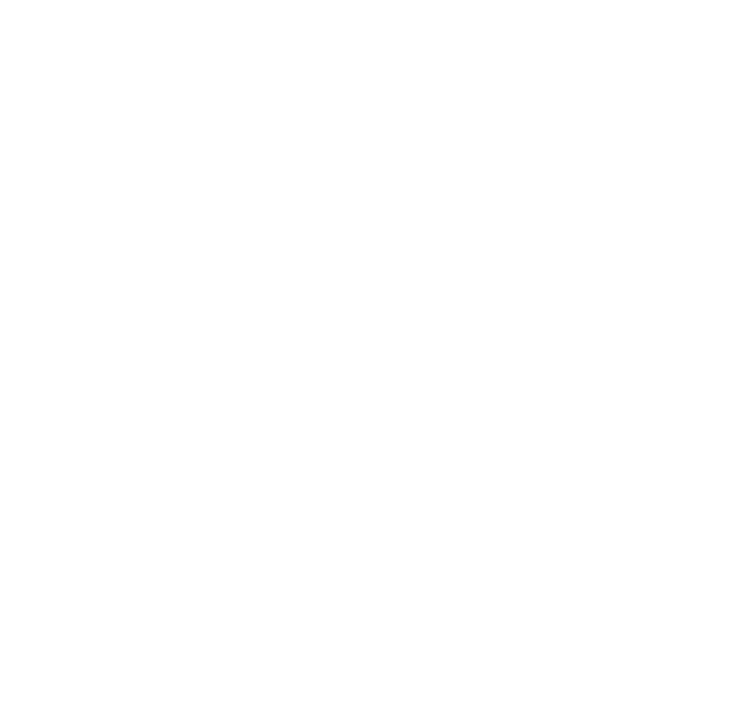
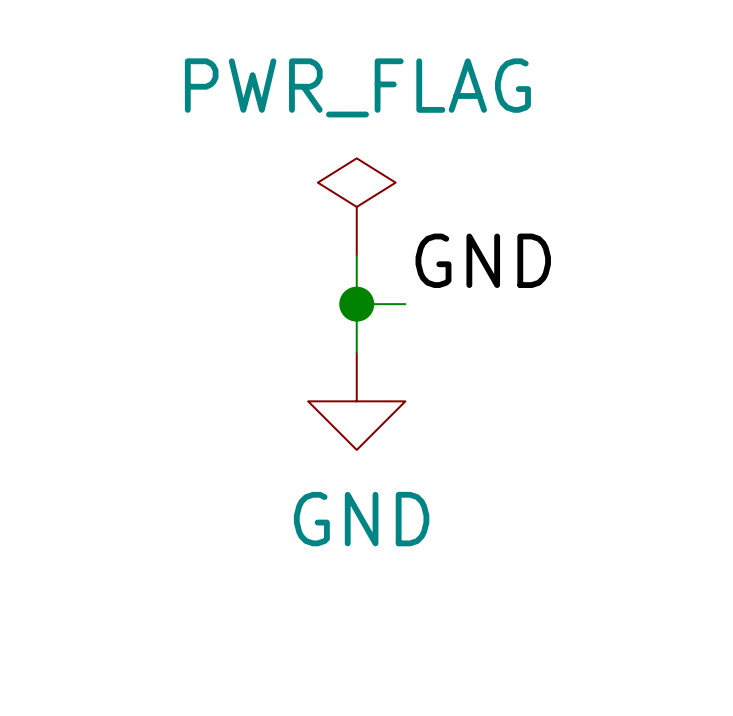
power symbol: none -> PWR_FLAG (356, 206)
wire: none -> (356, 255) (356, 352)
label: none -> GND (483, 260)
wire: none -> (356, 304) (405, 304)
junction: none -> (356, 304)
power symbol: none -> GND (356, 401)

